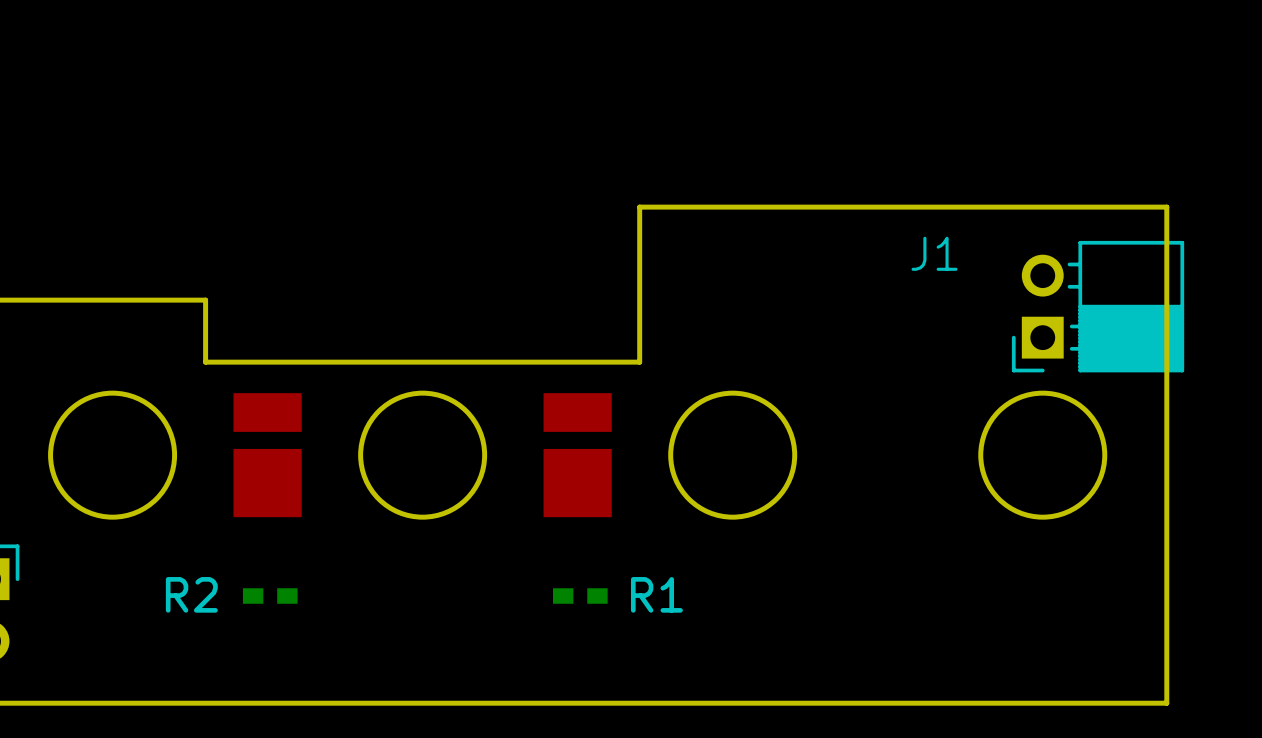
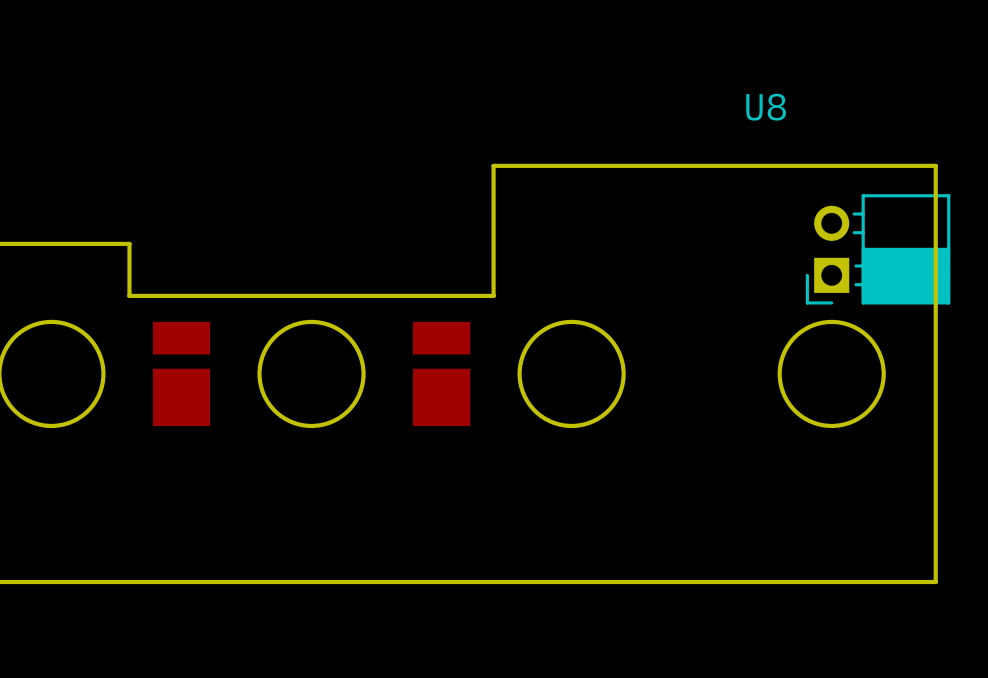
J1 name: J1 (934, 253) -> U8 (766, 107)
R2: (270, 596) -> none
R1: (580, 596) -> none

